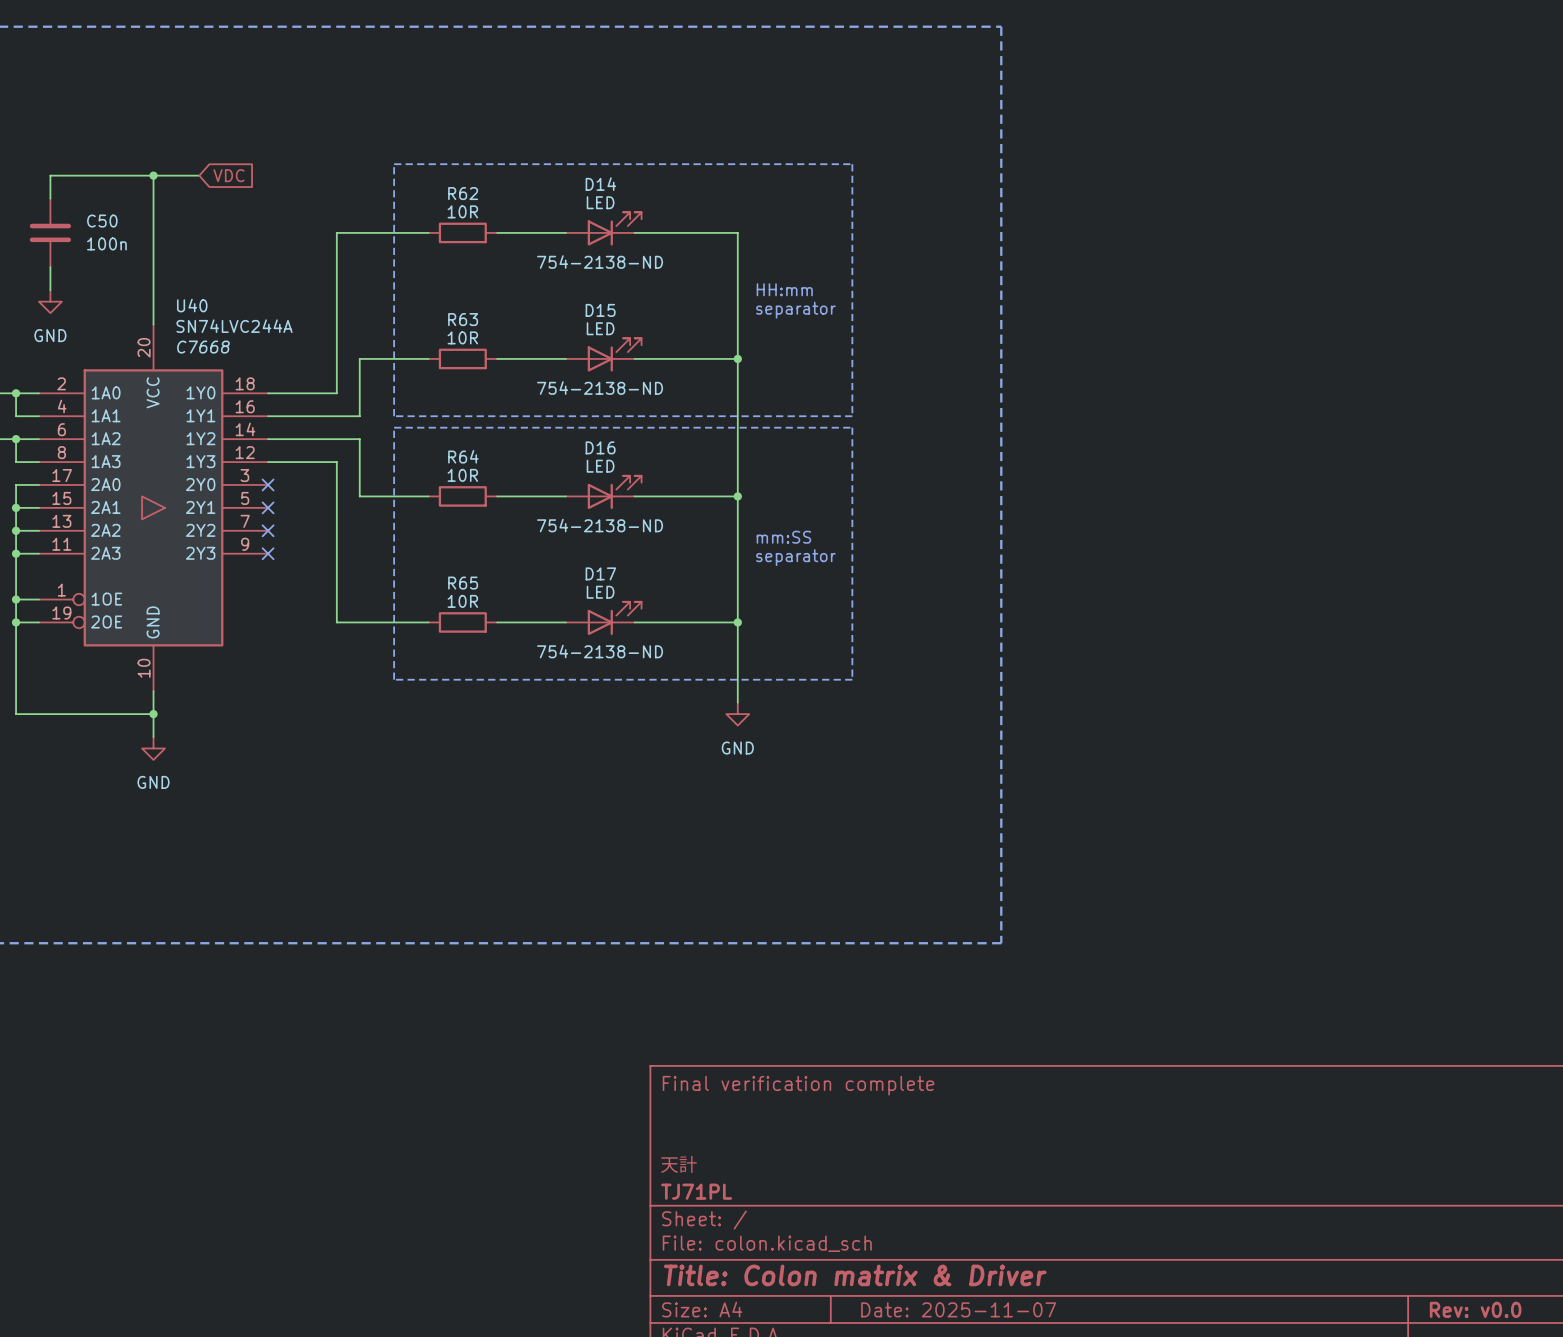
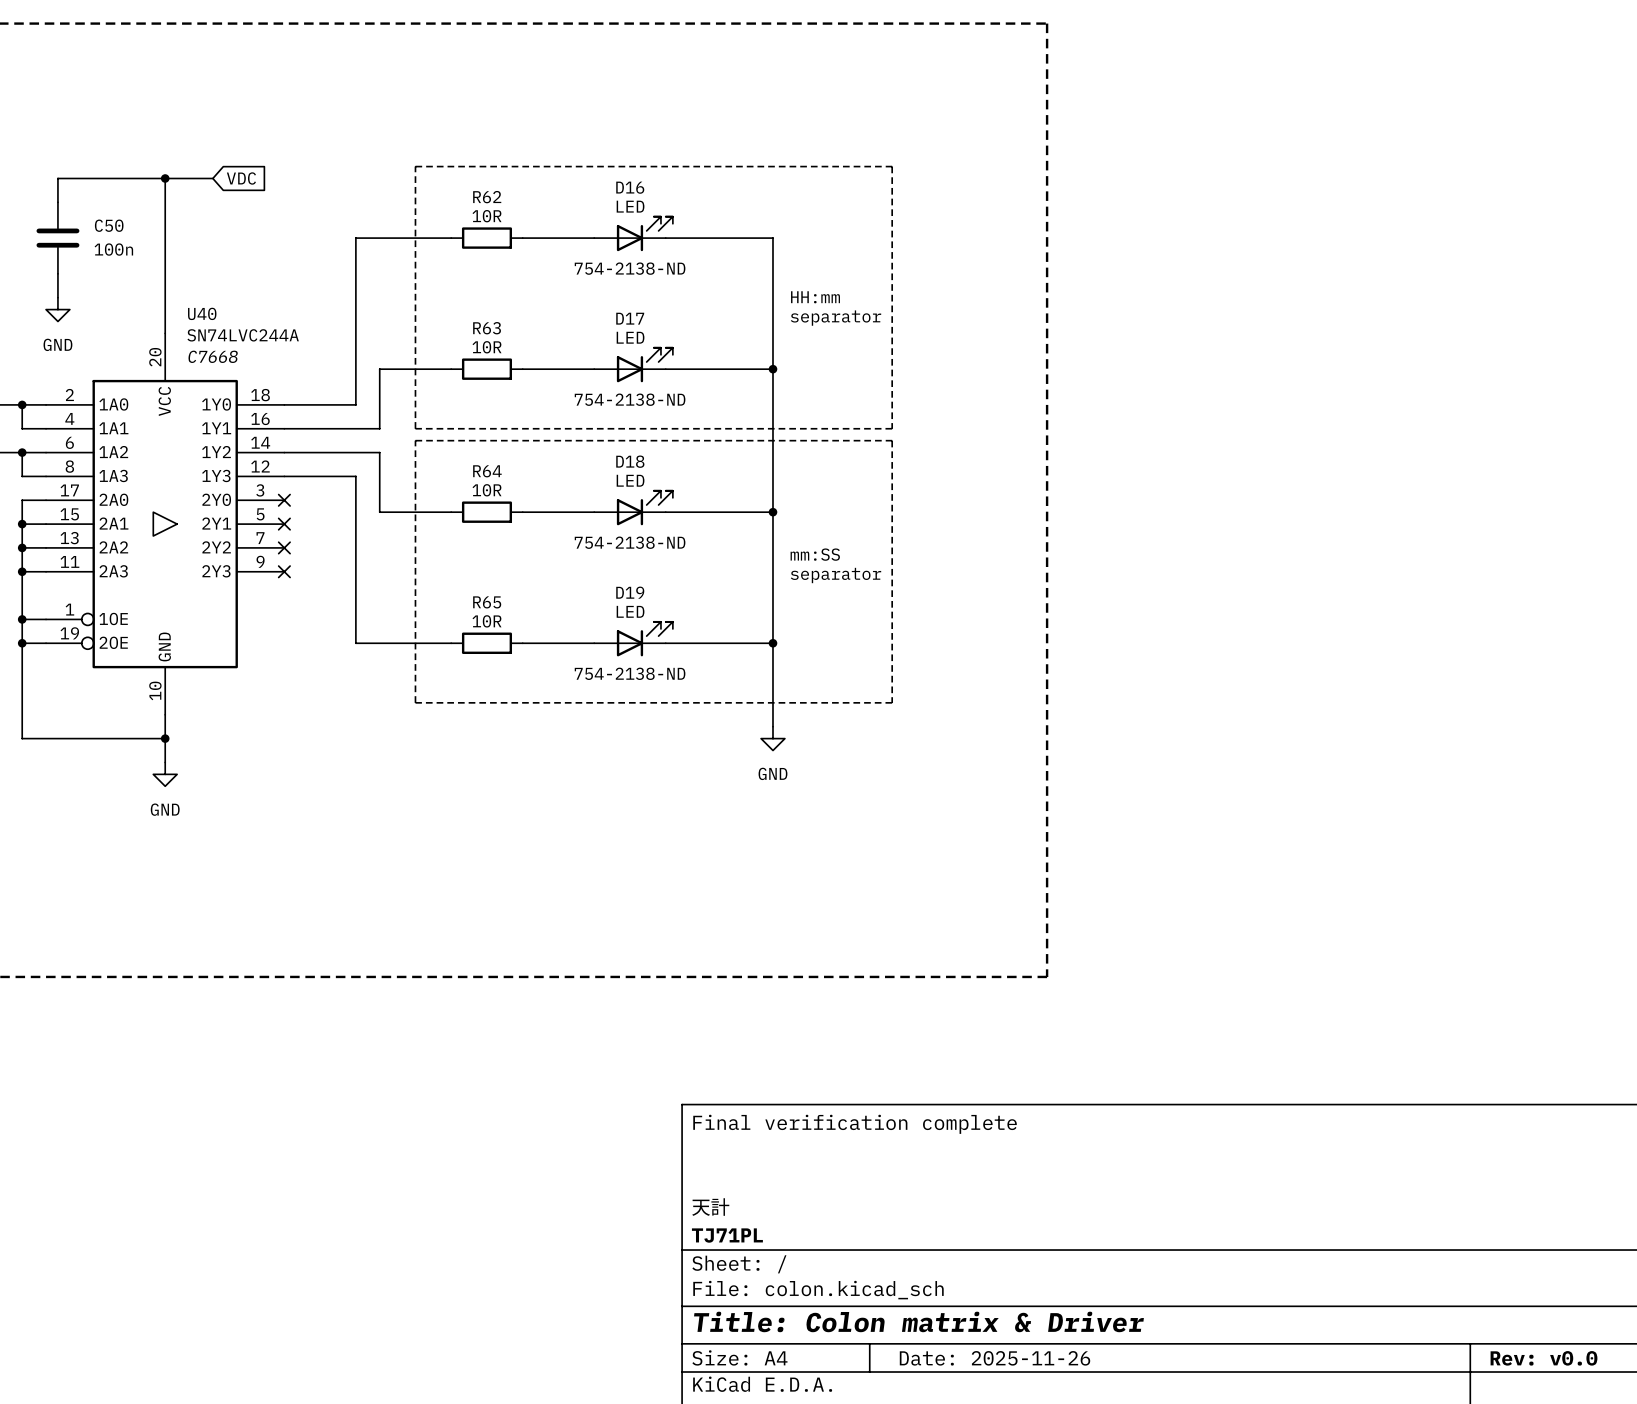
D14 name: D14 (600, 184) -> D16 (630, 187)
D15 name: D15 (600, 310) -> D17 (630, 318)
D16 name: D16 (600, 447) -> D18 (630, 461)
D17 name: D17 (600, 573) -> D19 (630, 592)
title block: Date: 2025-11-07 (958, 1309) -> Date: 2025-11-26 (995, 1358)

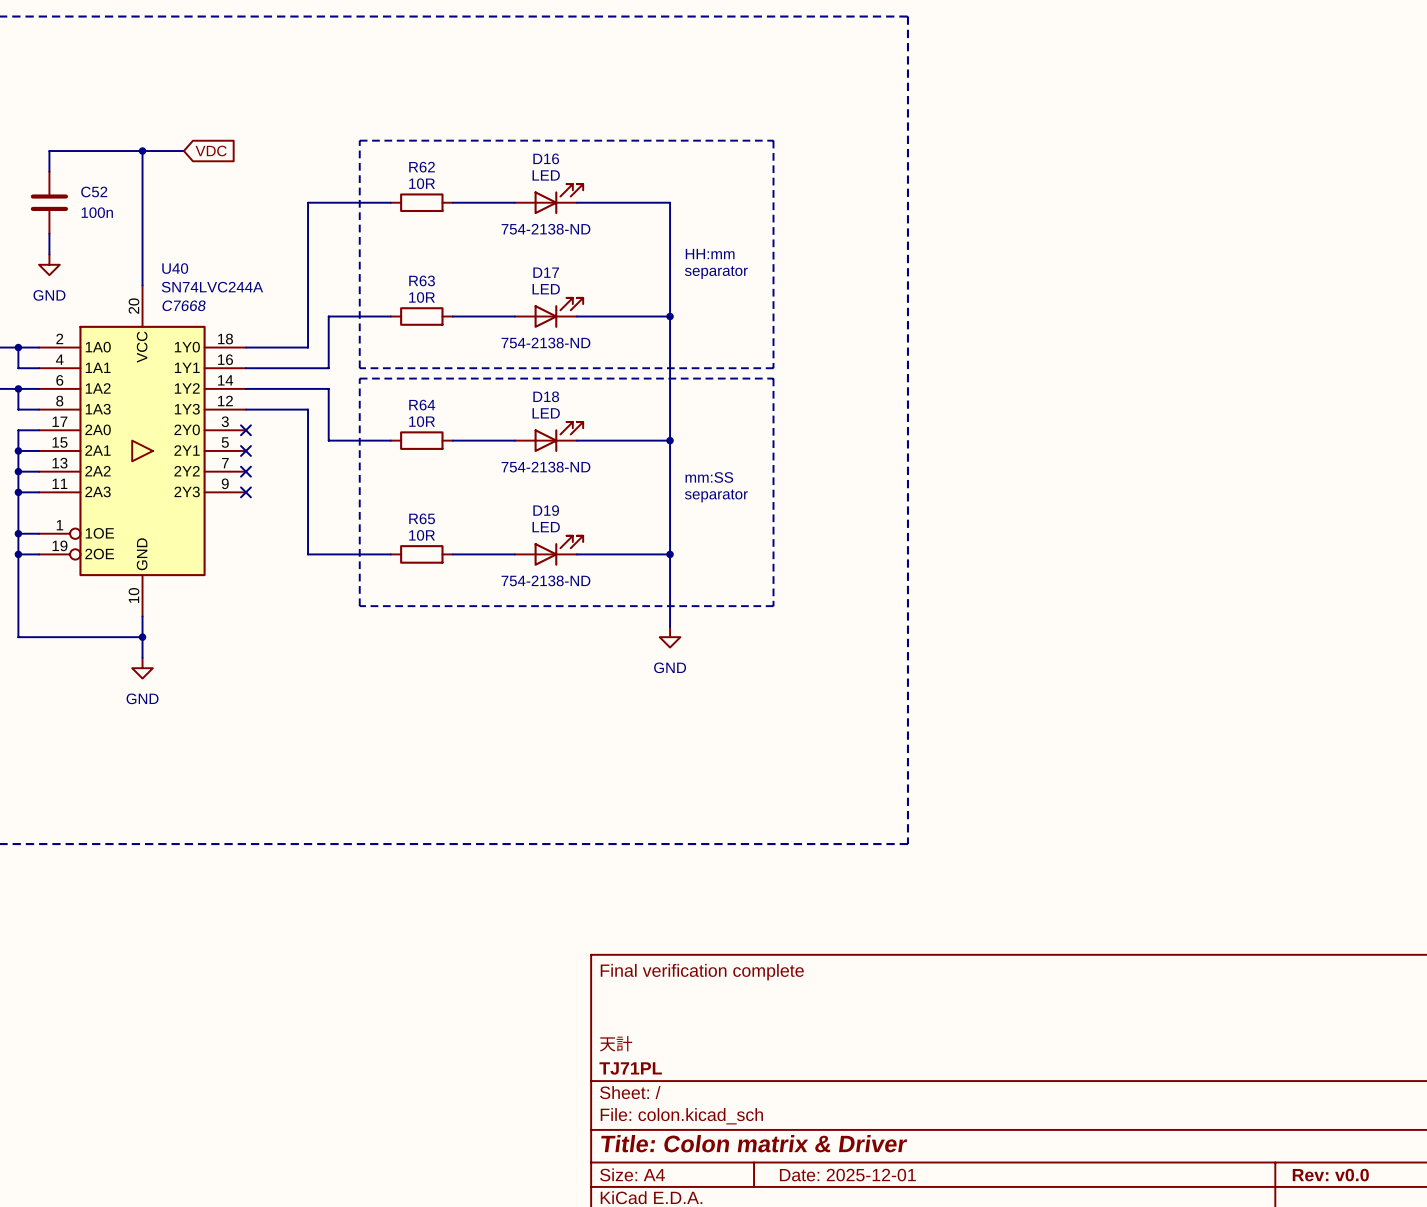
C50 name: C50 (109, 225) -> C52 (94, 191)
title block: Date: 2025-11-26 (995, 1358) -> Date: 2025-12-01 (847, 1175)

